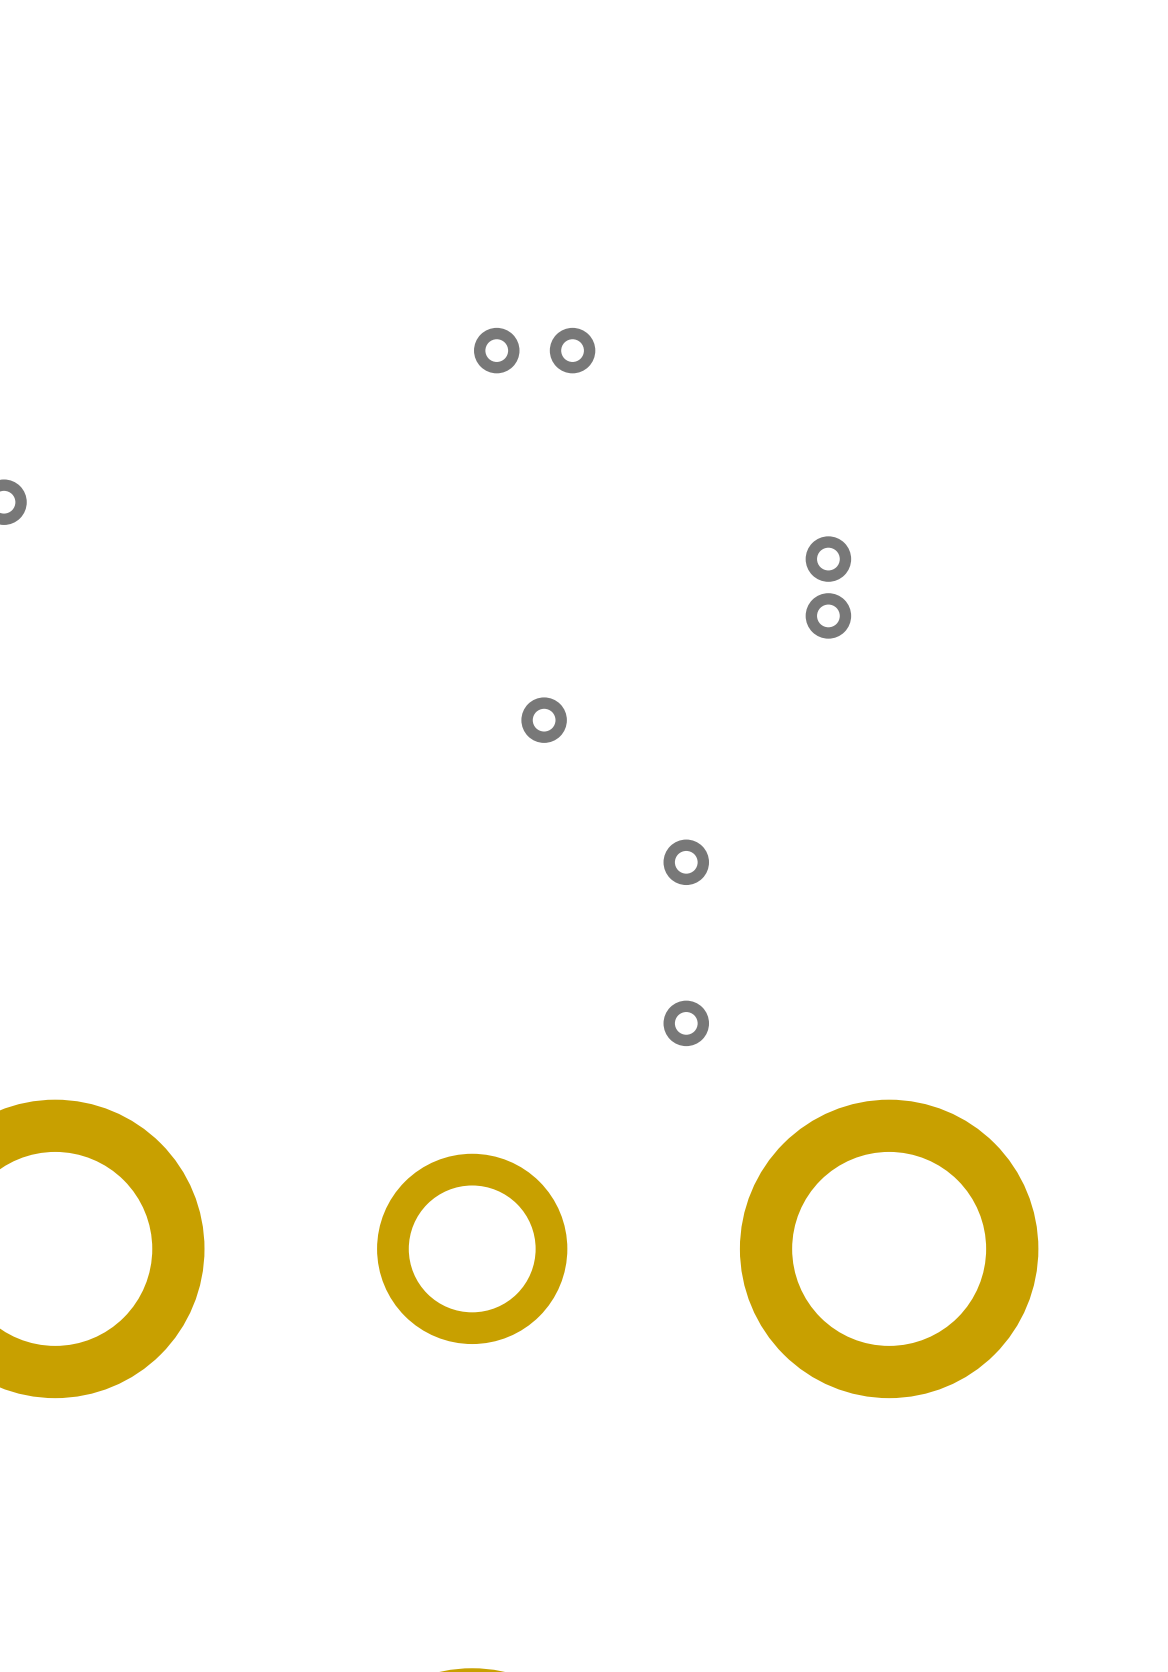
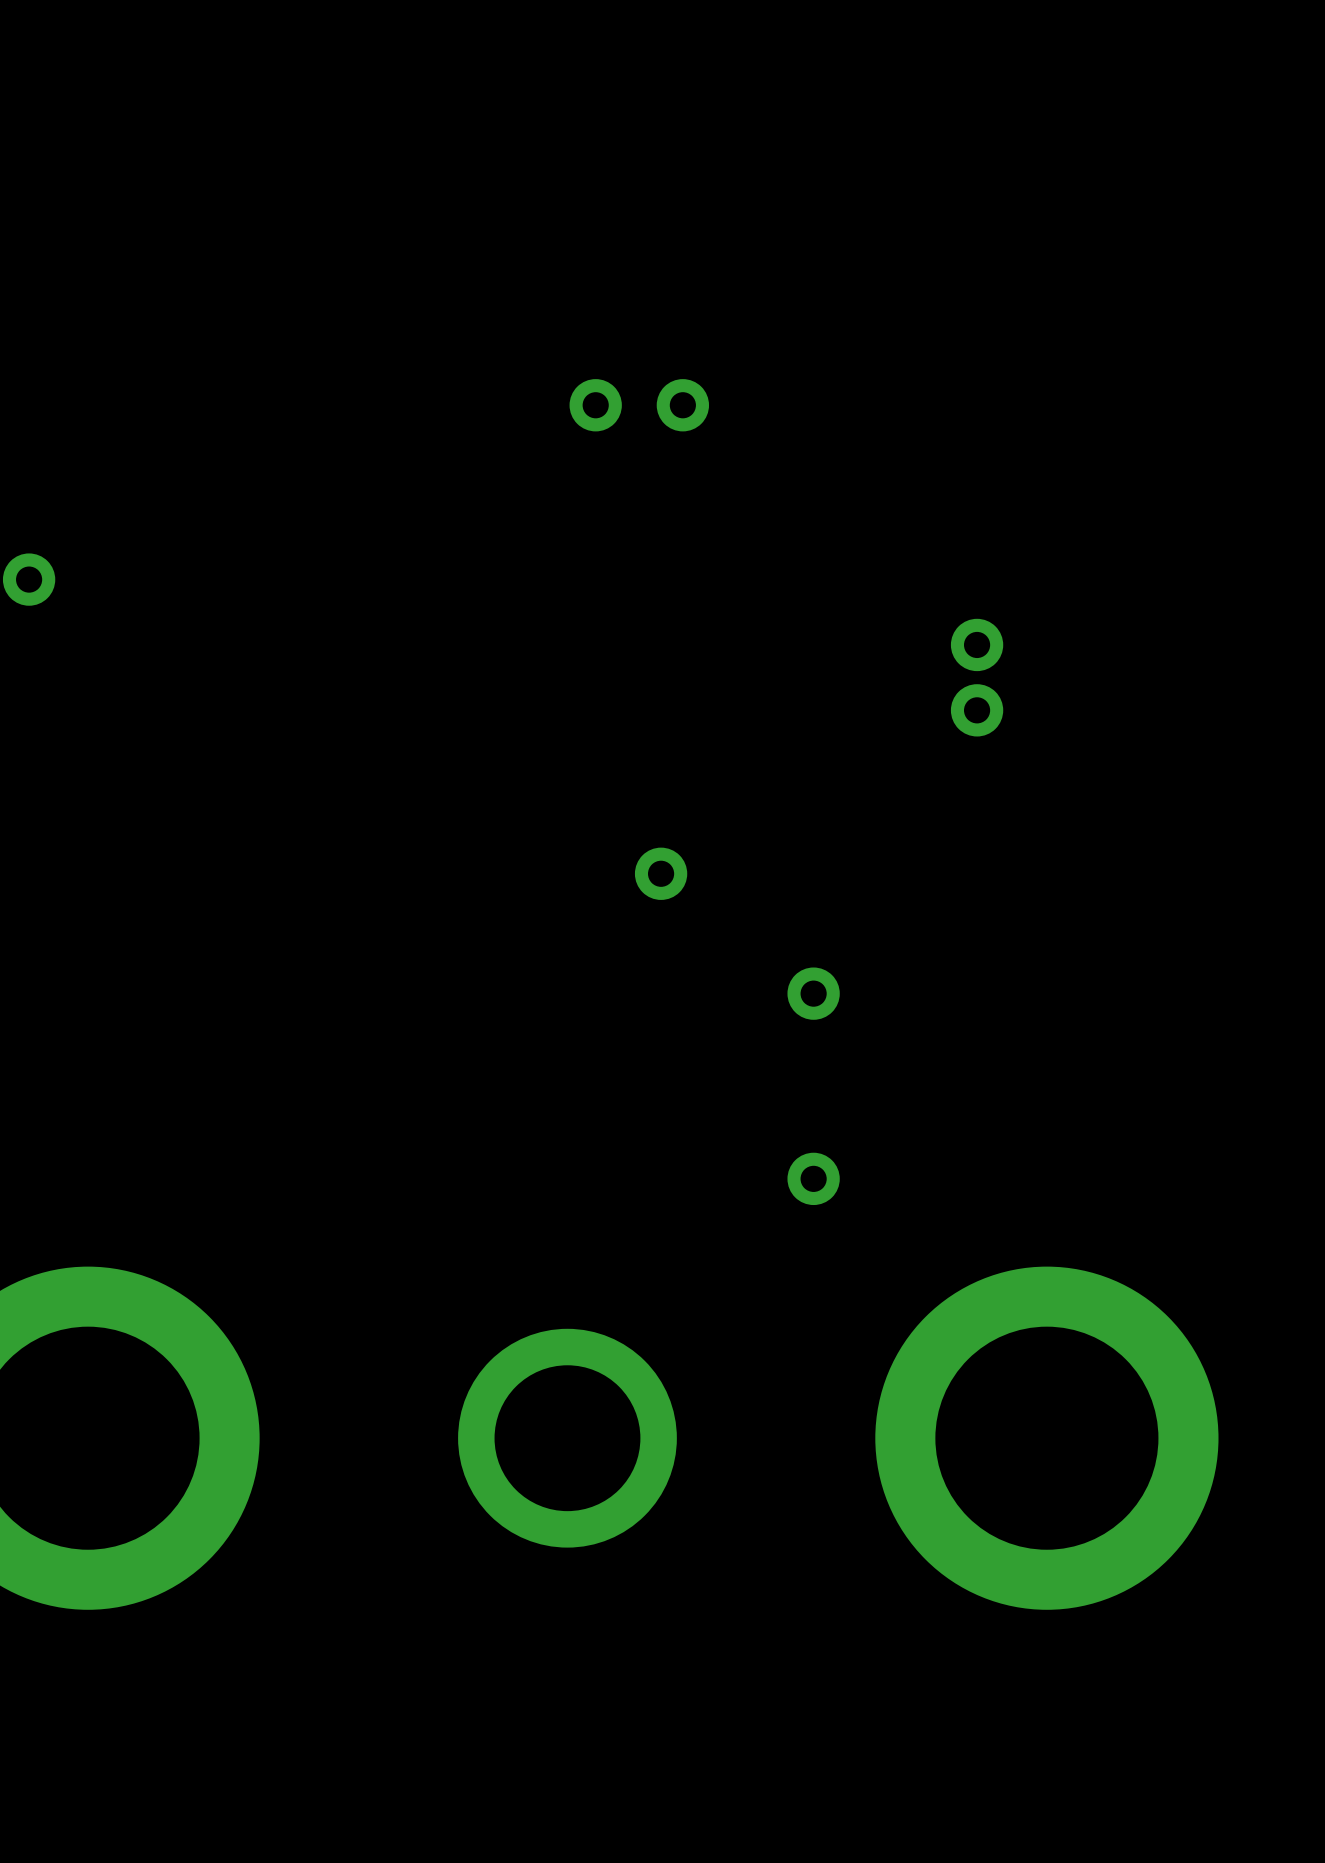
via position: (544, 720) -> (661, 873)

